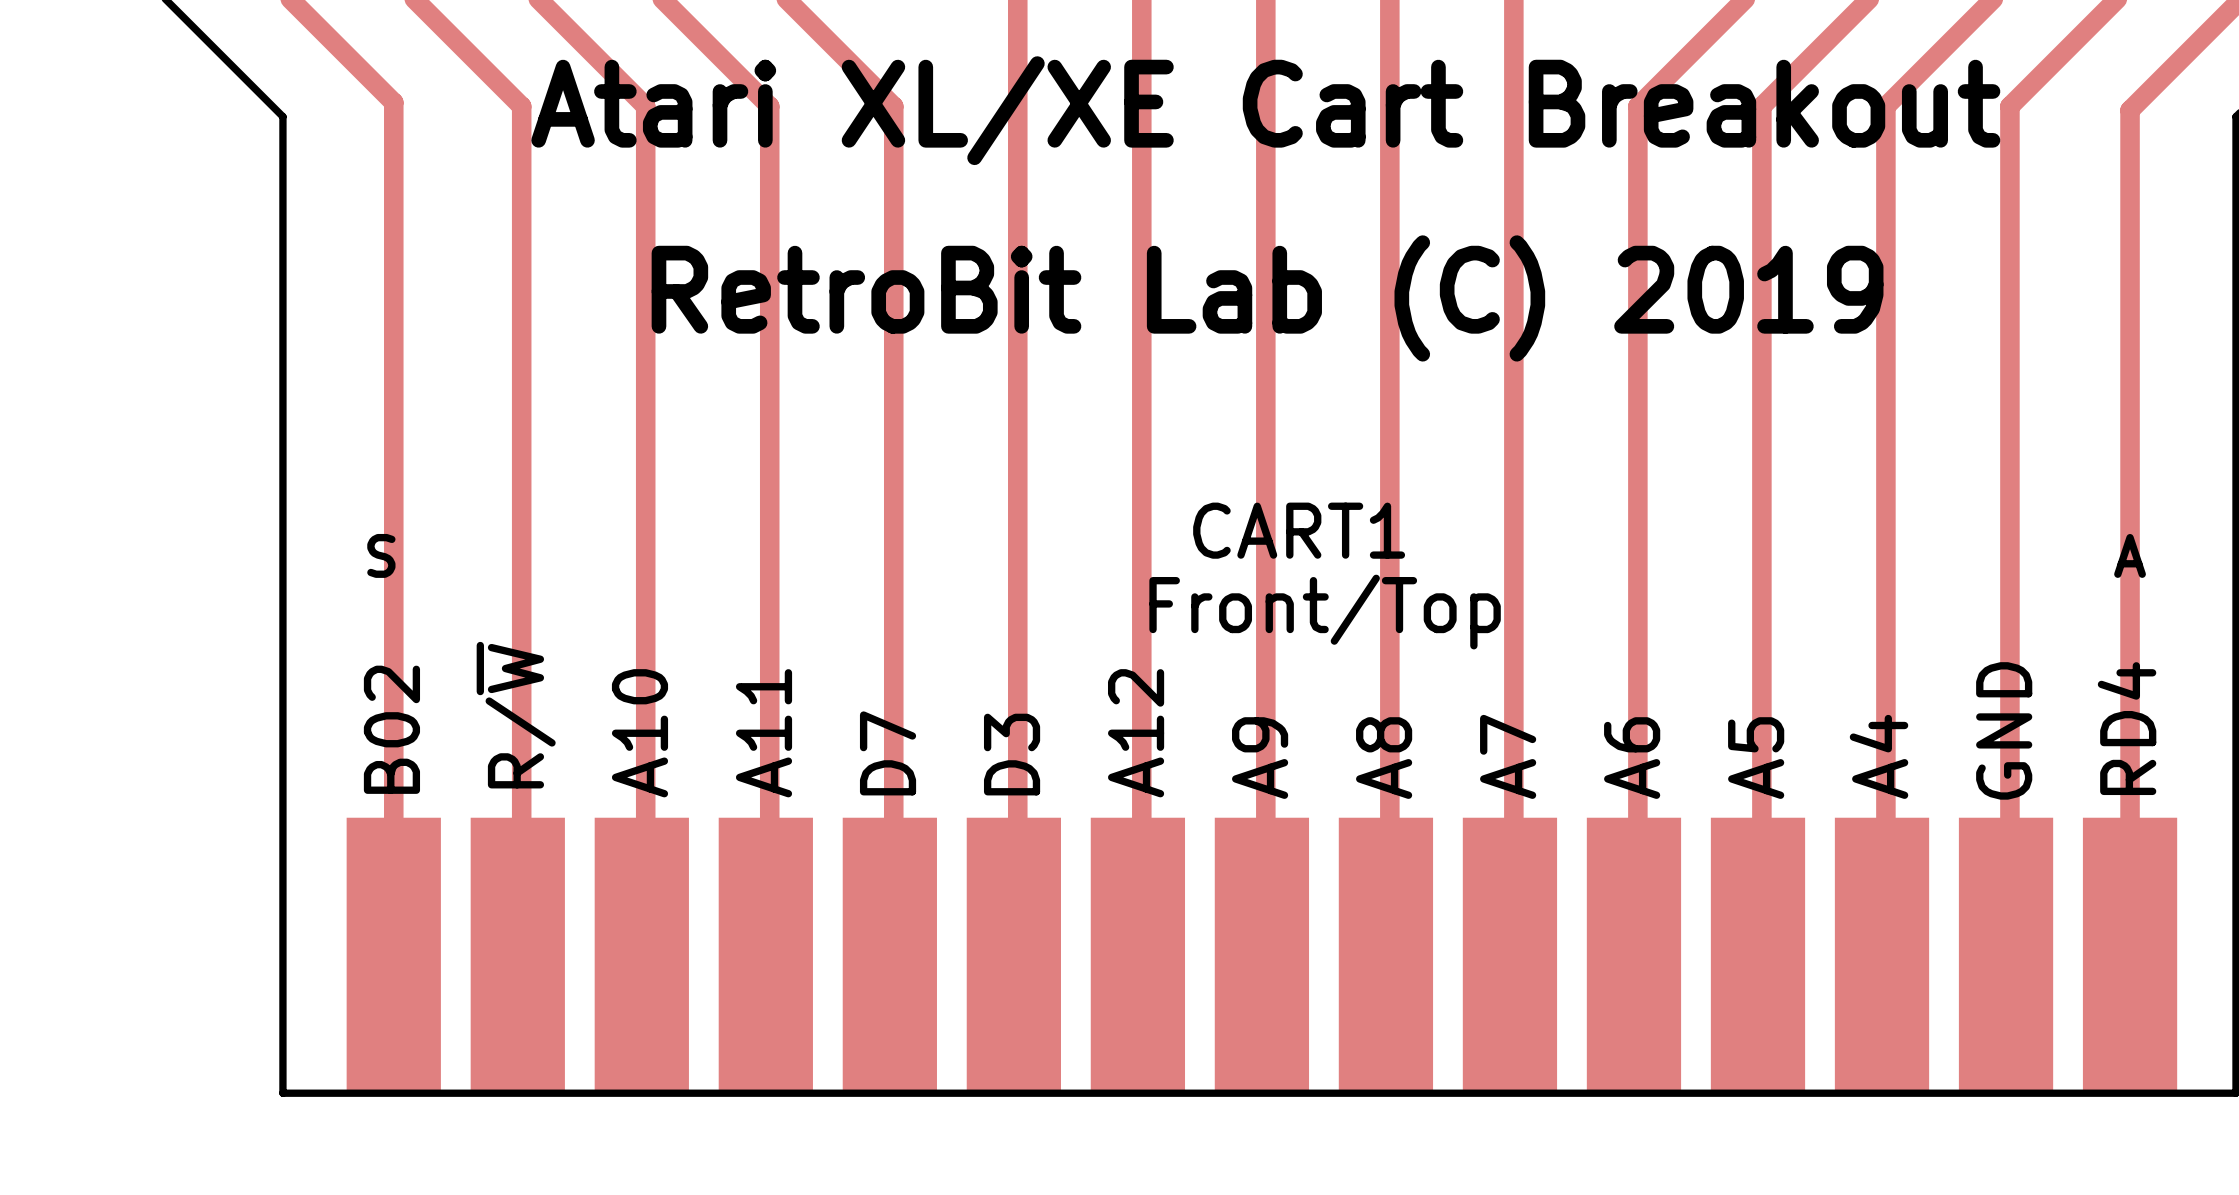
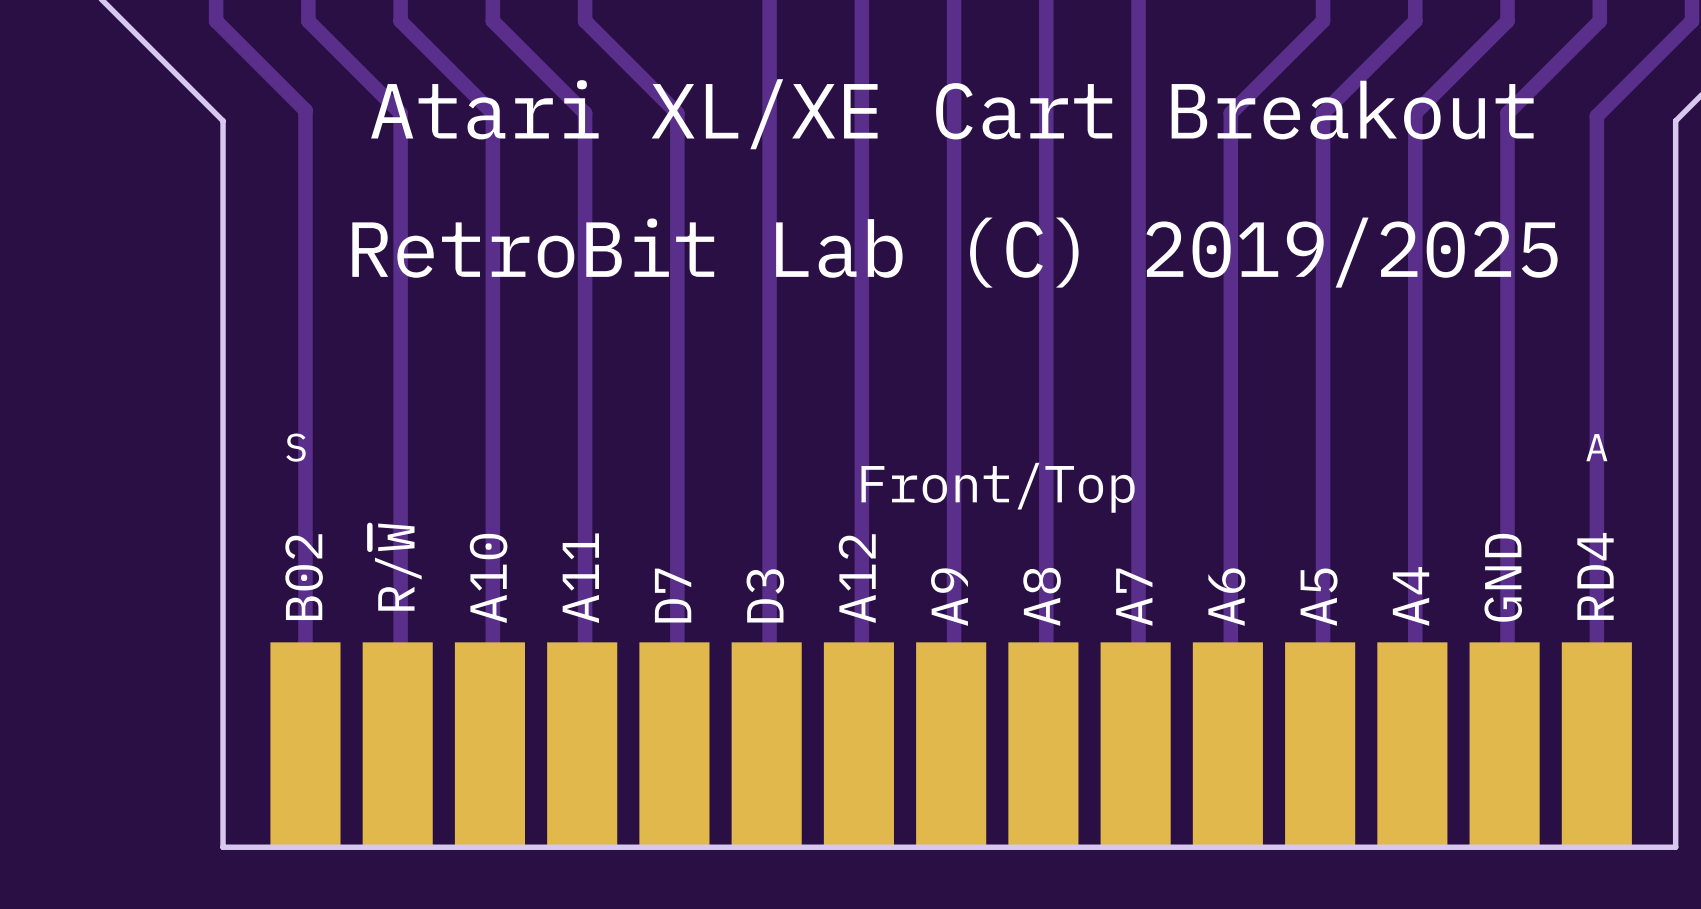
text: RetroBit Lab (C) 2019 (1267, 298) -> RetroBit Lab (C) 2019/2025 (954, 252)
CART1 name: CART1 (1299, 530) -> none

